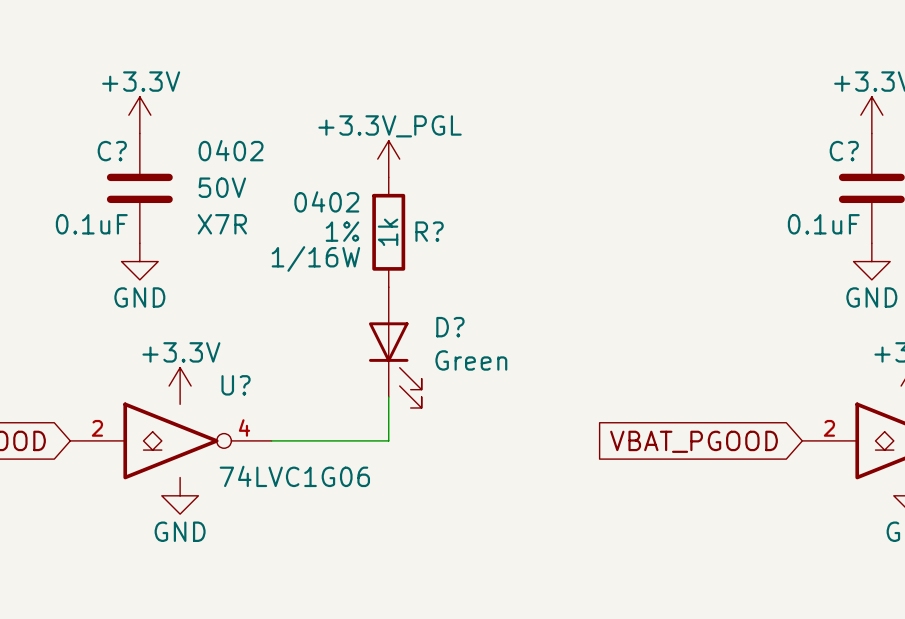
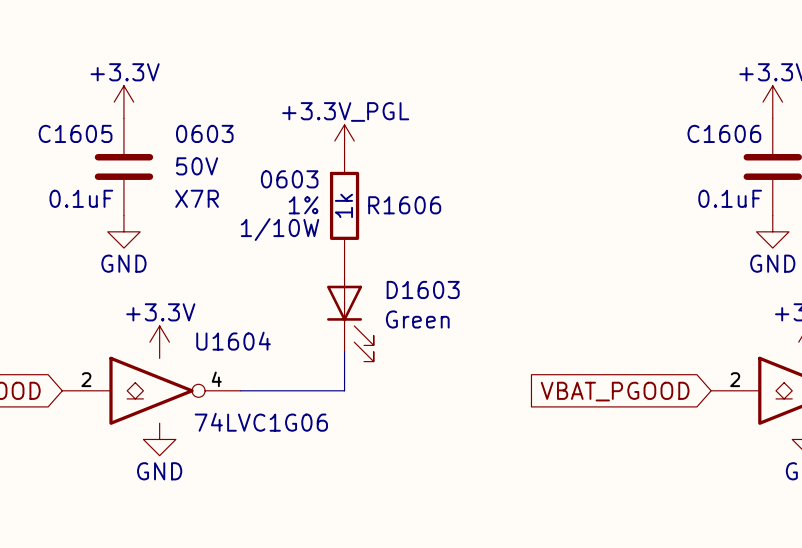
C? text: 0402 (231, 150) -> 0603 (204, 133)
C? name: C? (112, 151) -> C1605 (75, 133)
C? name: C? (844, 151) -> C1606 (724, 133)
R? text: 0402 (326, 201) -> 0603 (289, 179)
R? name: R? (429, 231) -> R1606 (404, 205)
R? text: 1/16W (315, 258) -> 1/10W (280, 229)
D? name: D? (450, 327) -> D1603 (423, 289)
U? name: U? (236, 385) -> U1604 (233, 341)

